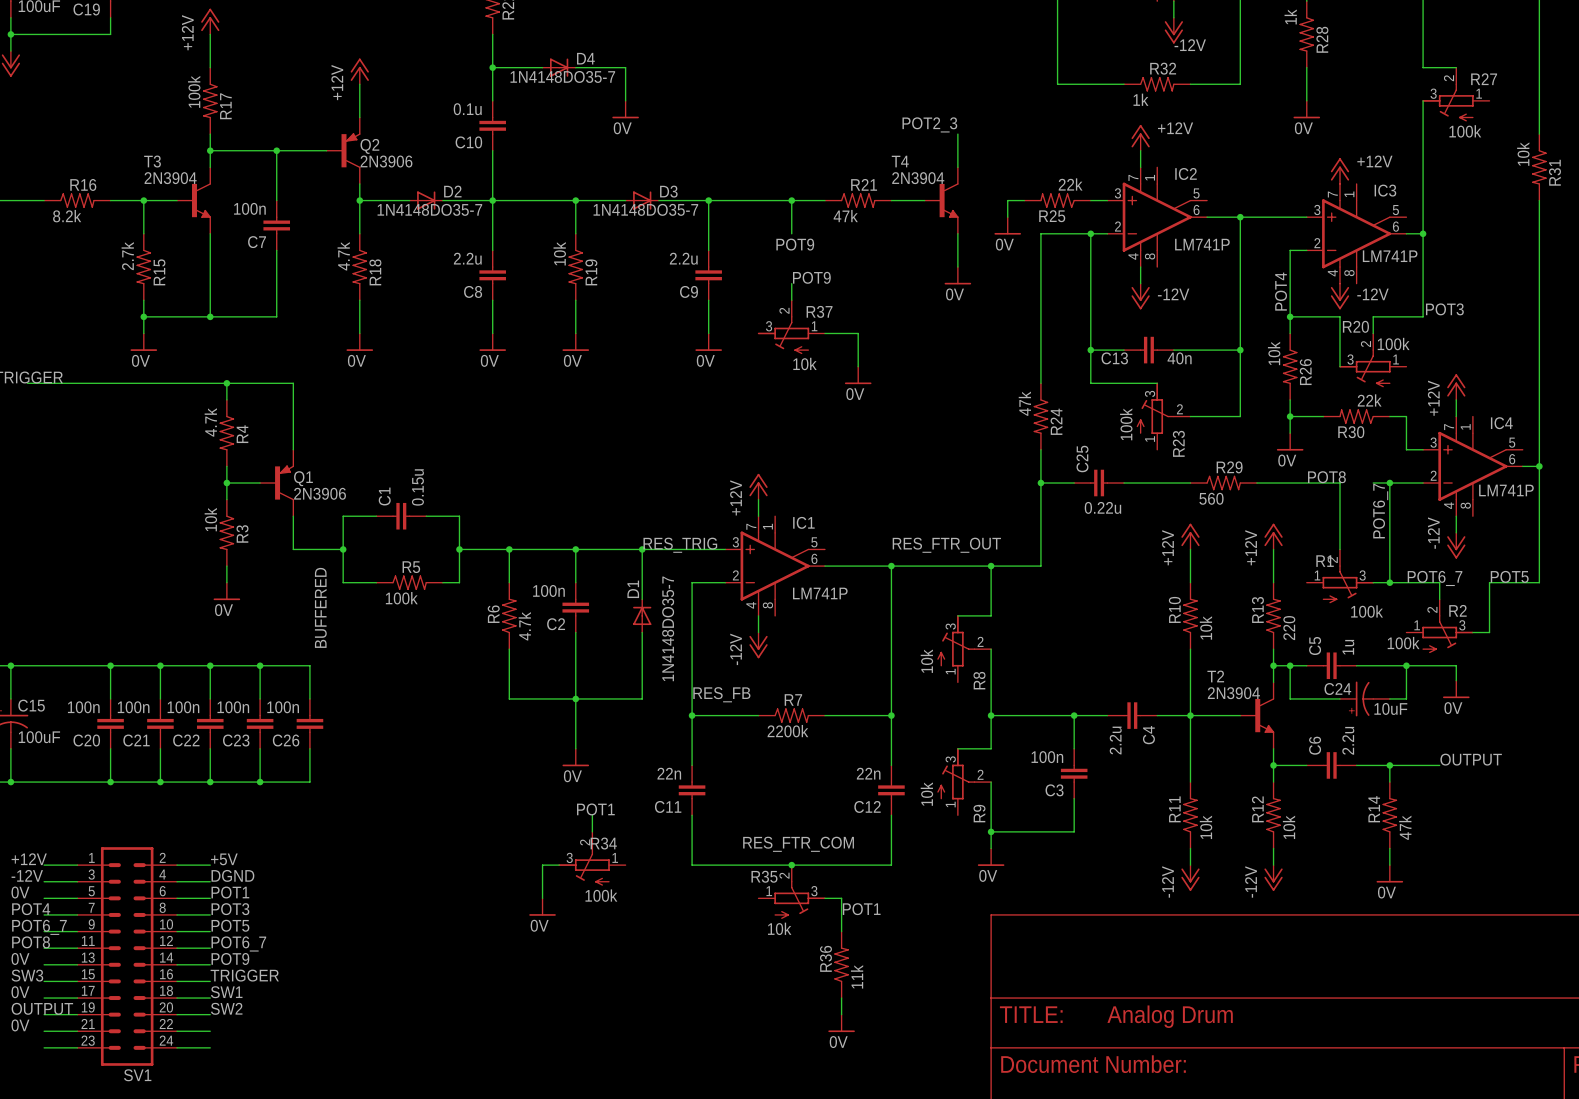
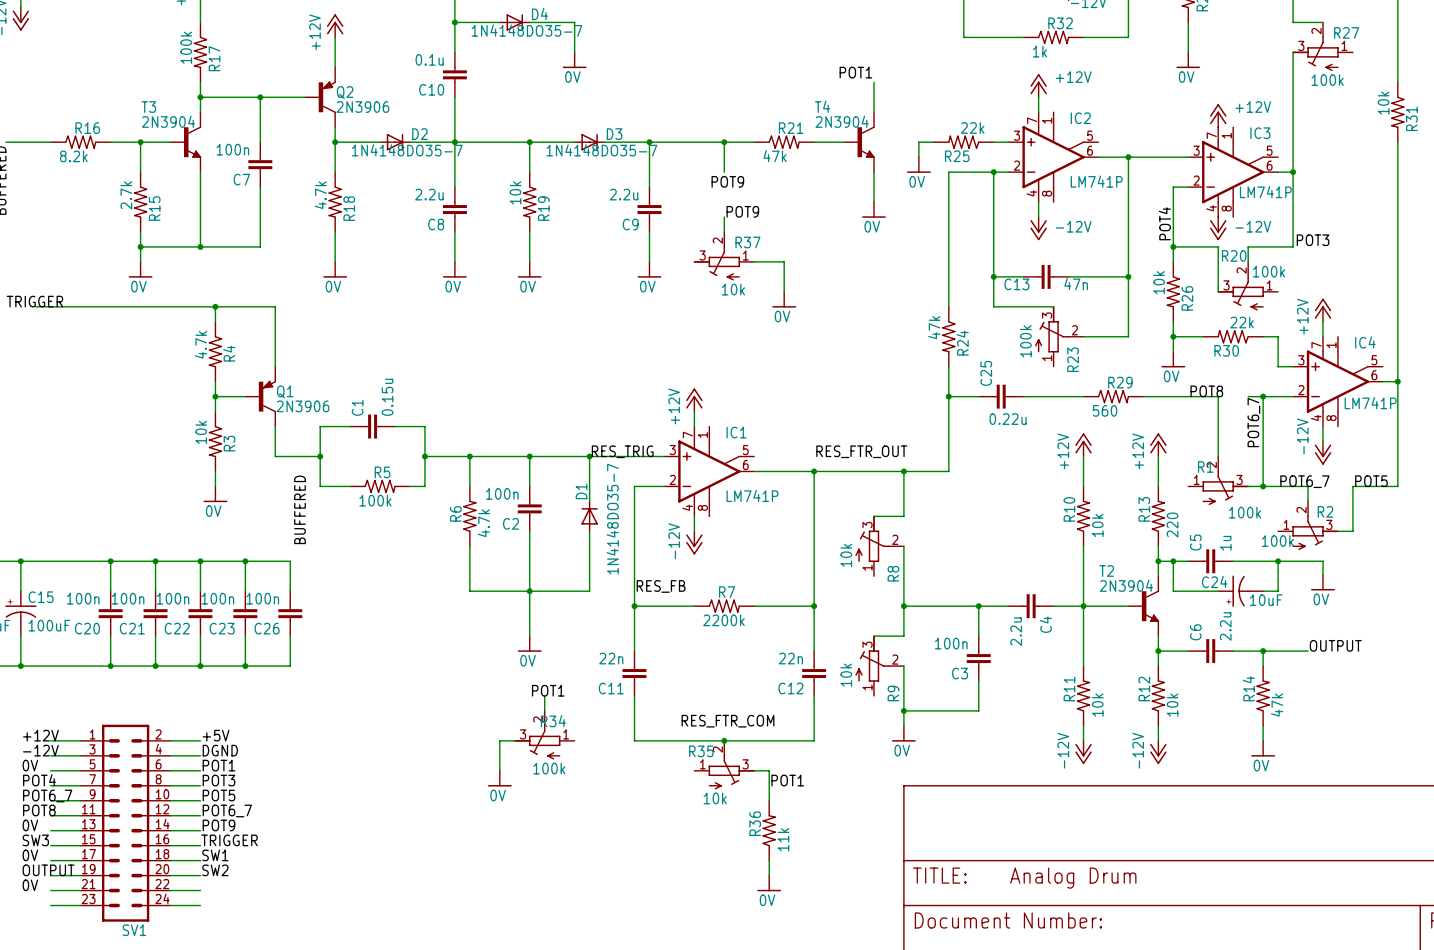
label: POT2_3 (929, 124) -> POT1 (855, 72)
C13 value: 40n (1179, 358) -> 47n (1076, 284)

